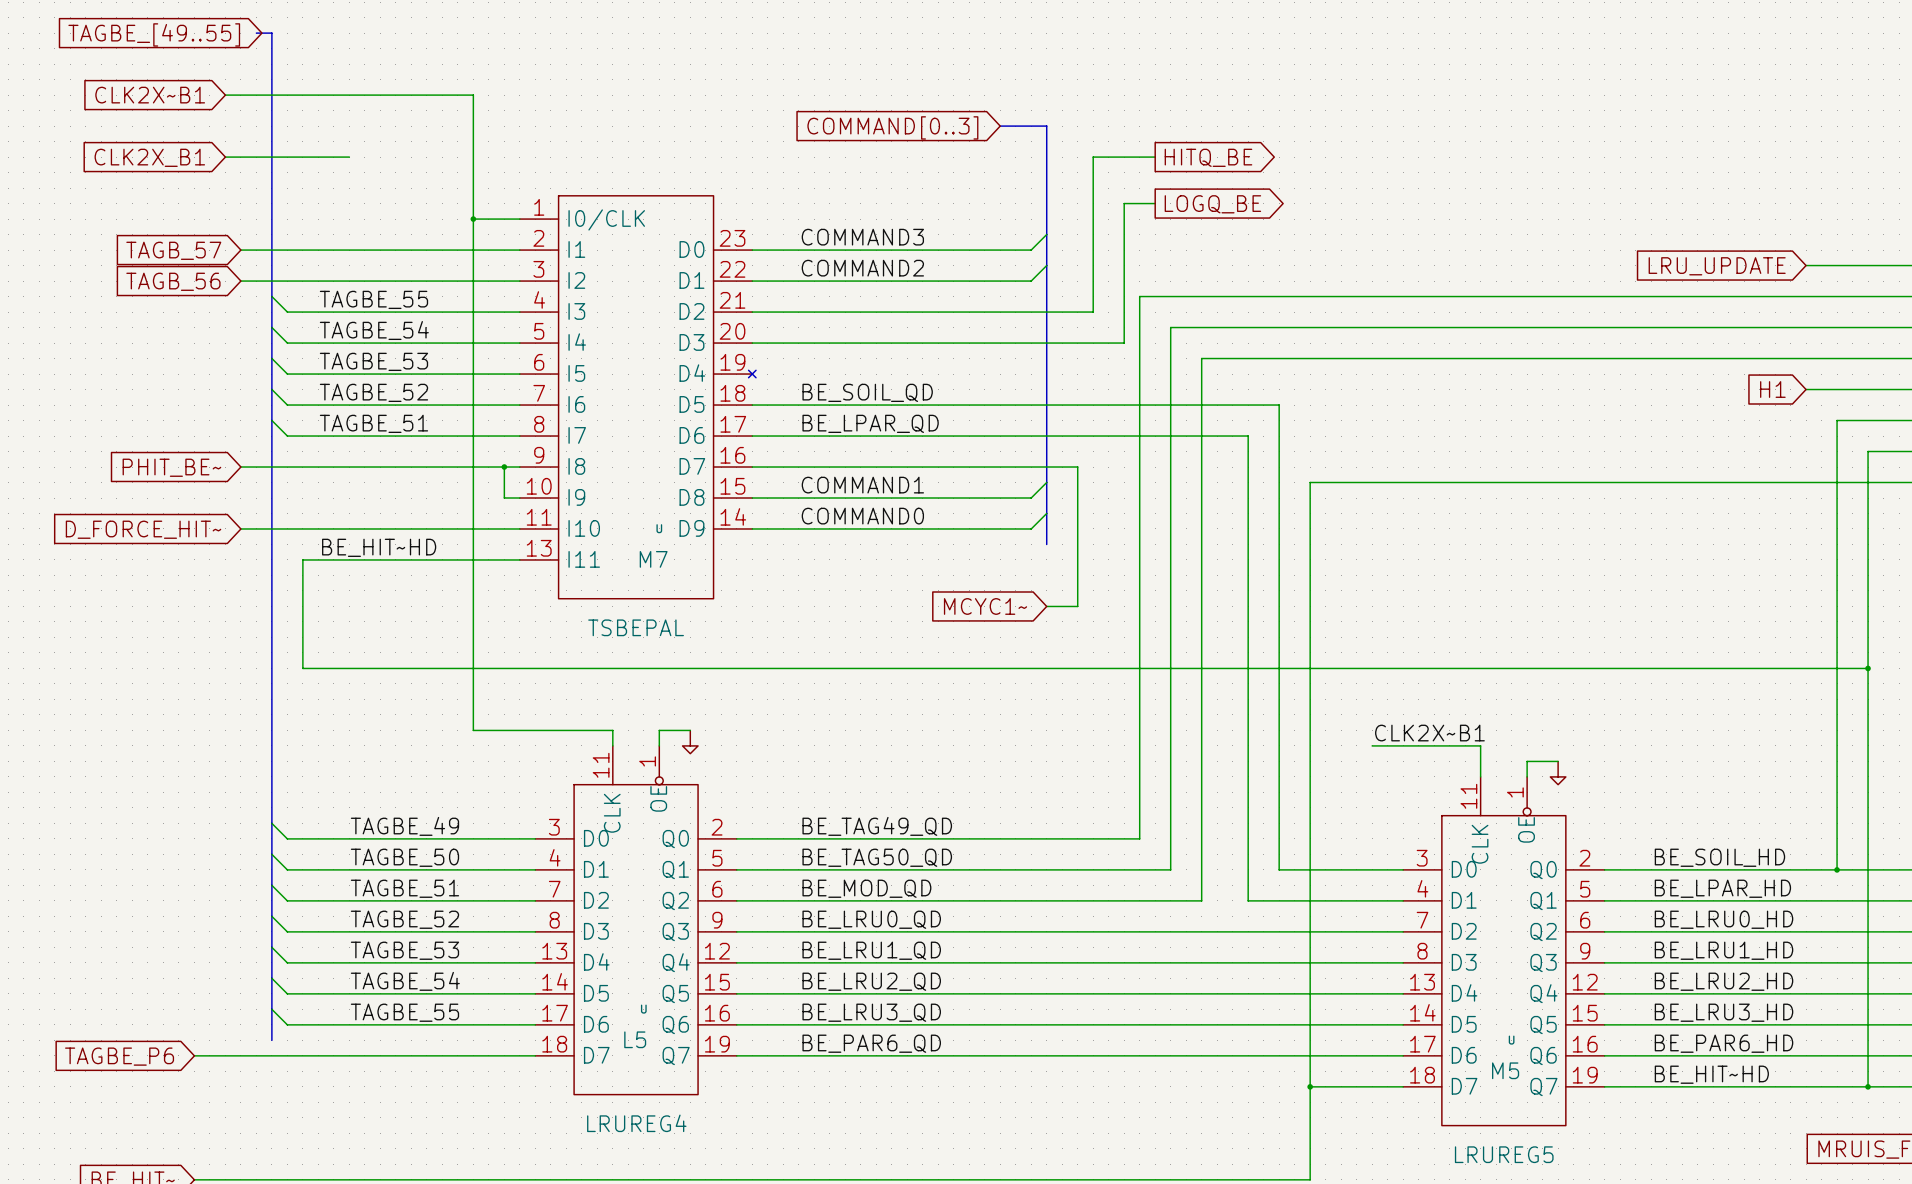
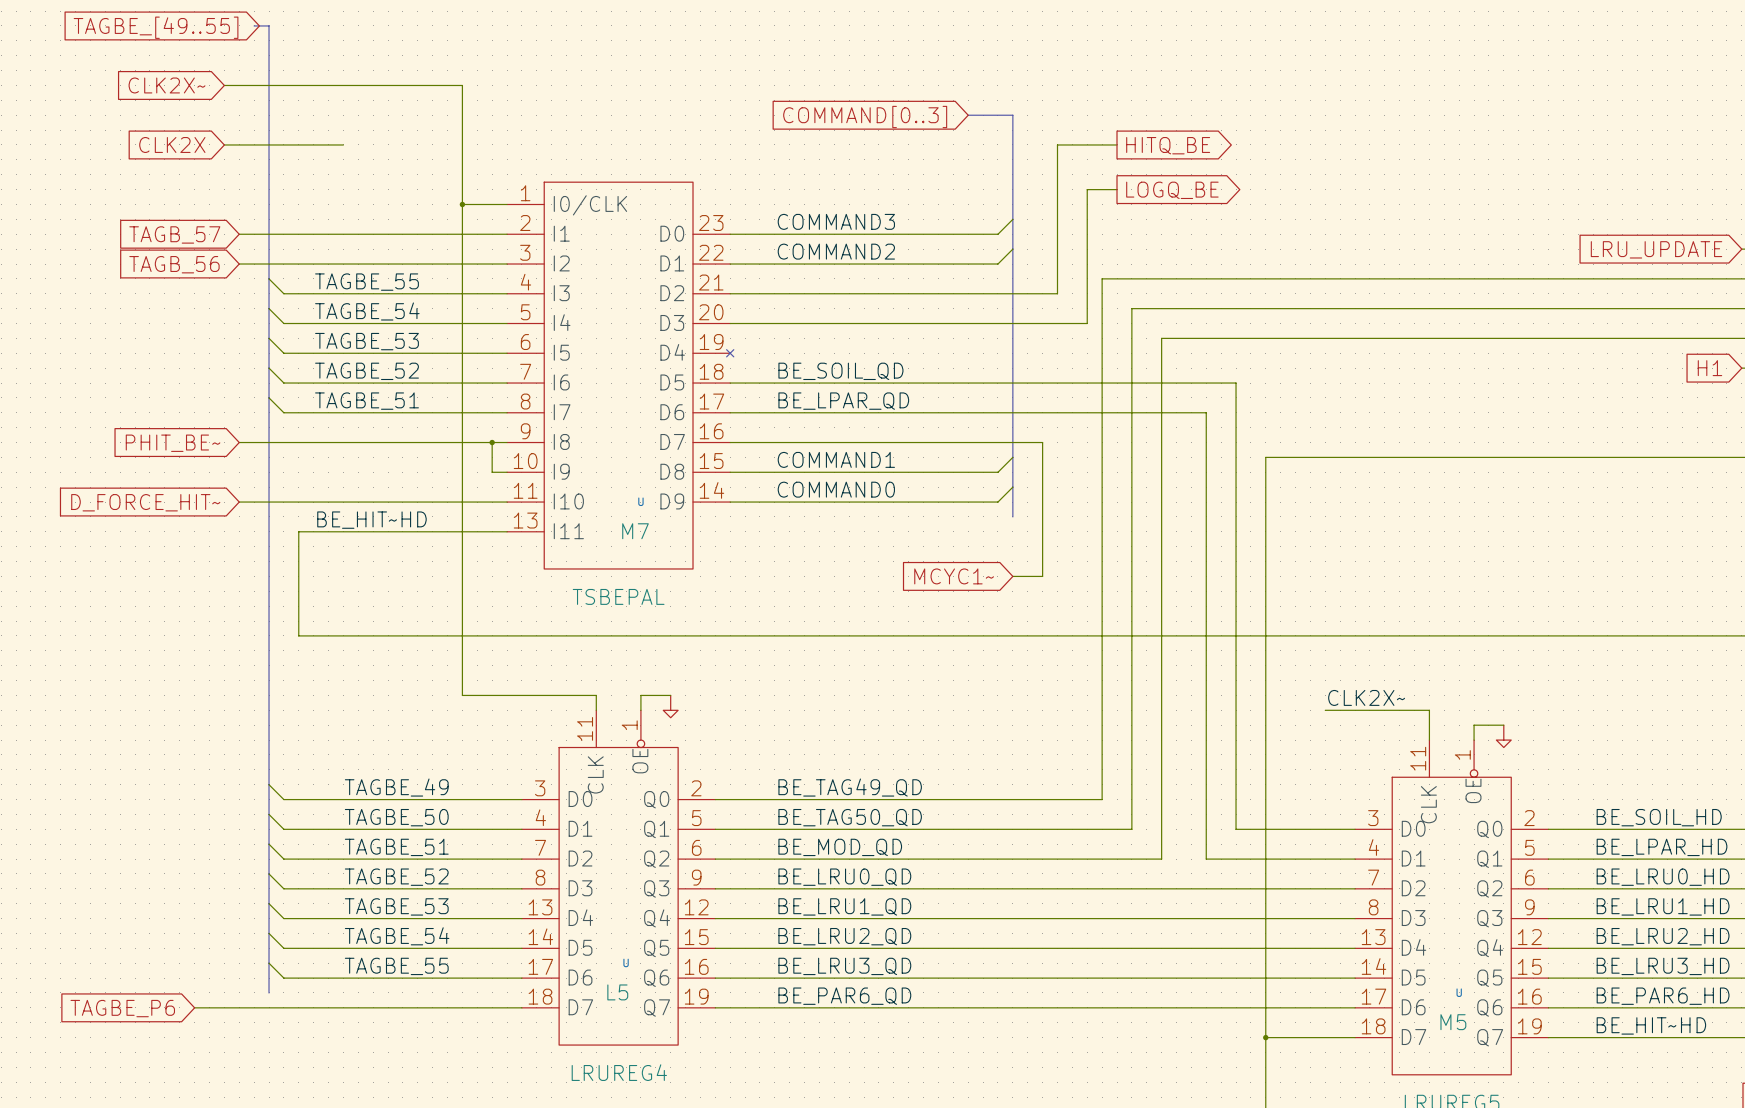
global label: CLK2X~B1 (150, 95) -> CLK2X~ (167, 85)
global label: CLK2X_B1 (149, 157) -> CLK2X (172, 144)
label: CLK2X~B1 (1429, 733) -> CLK2X~ (1366, 697)

